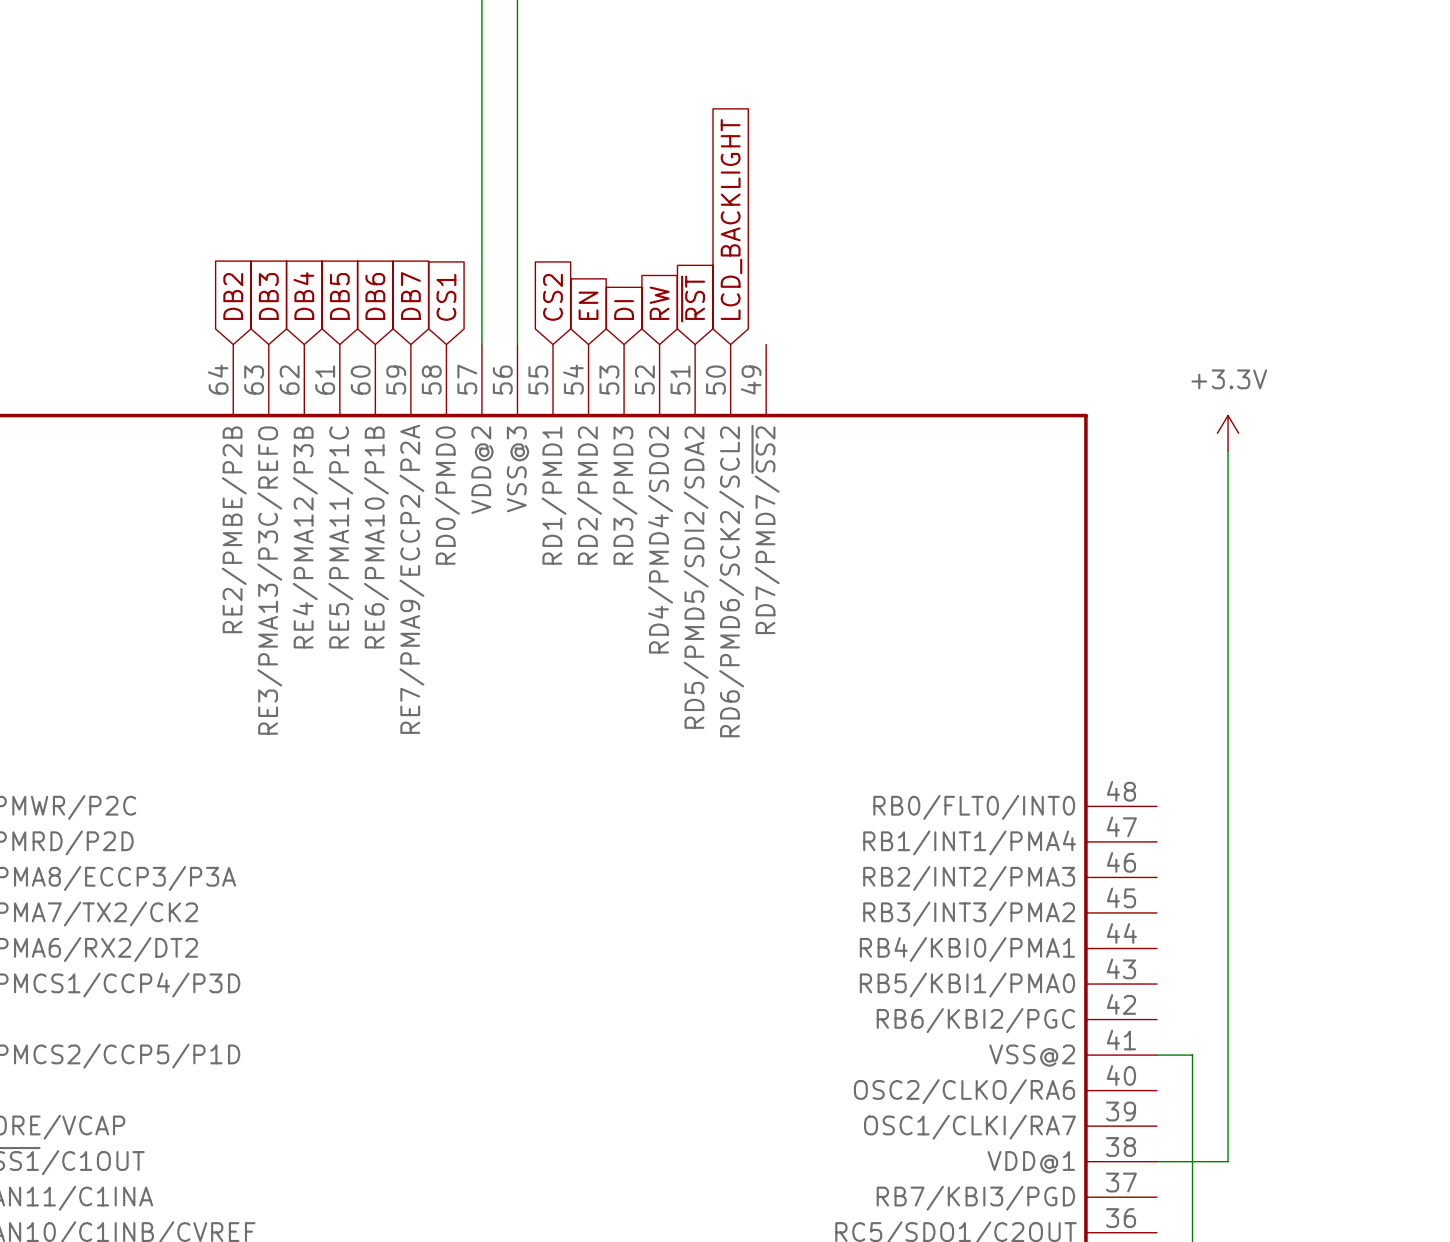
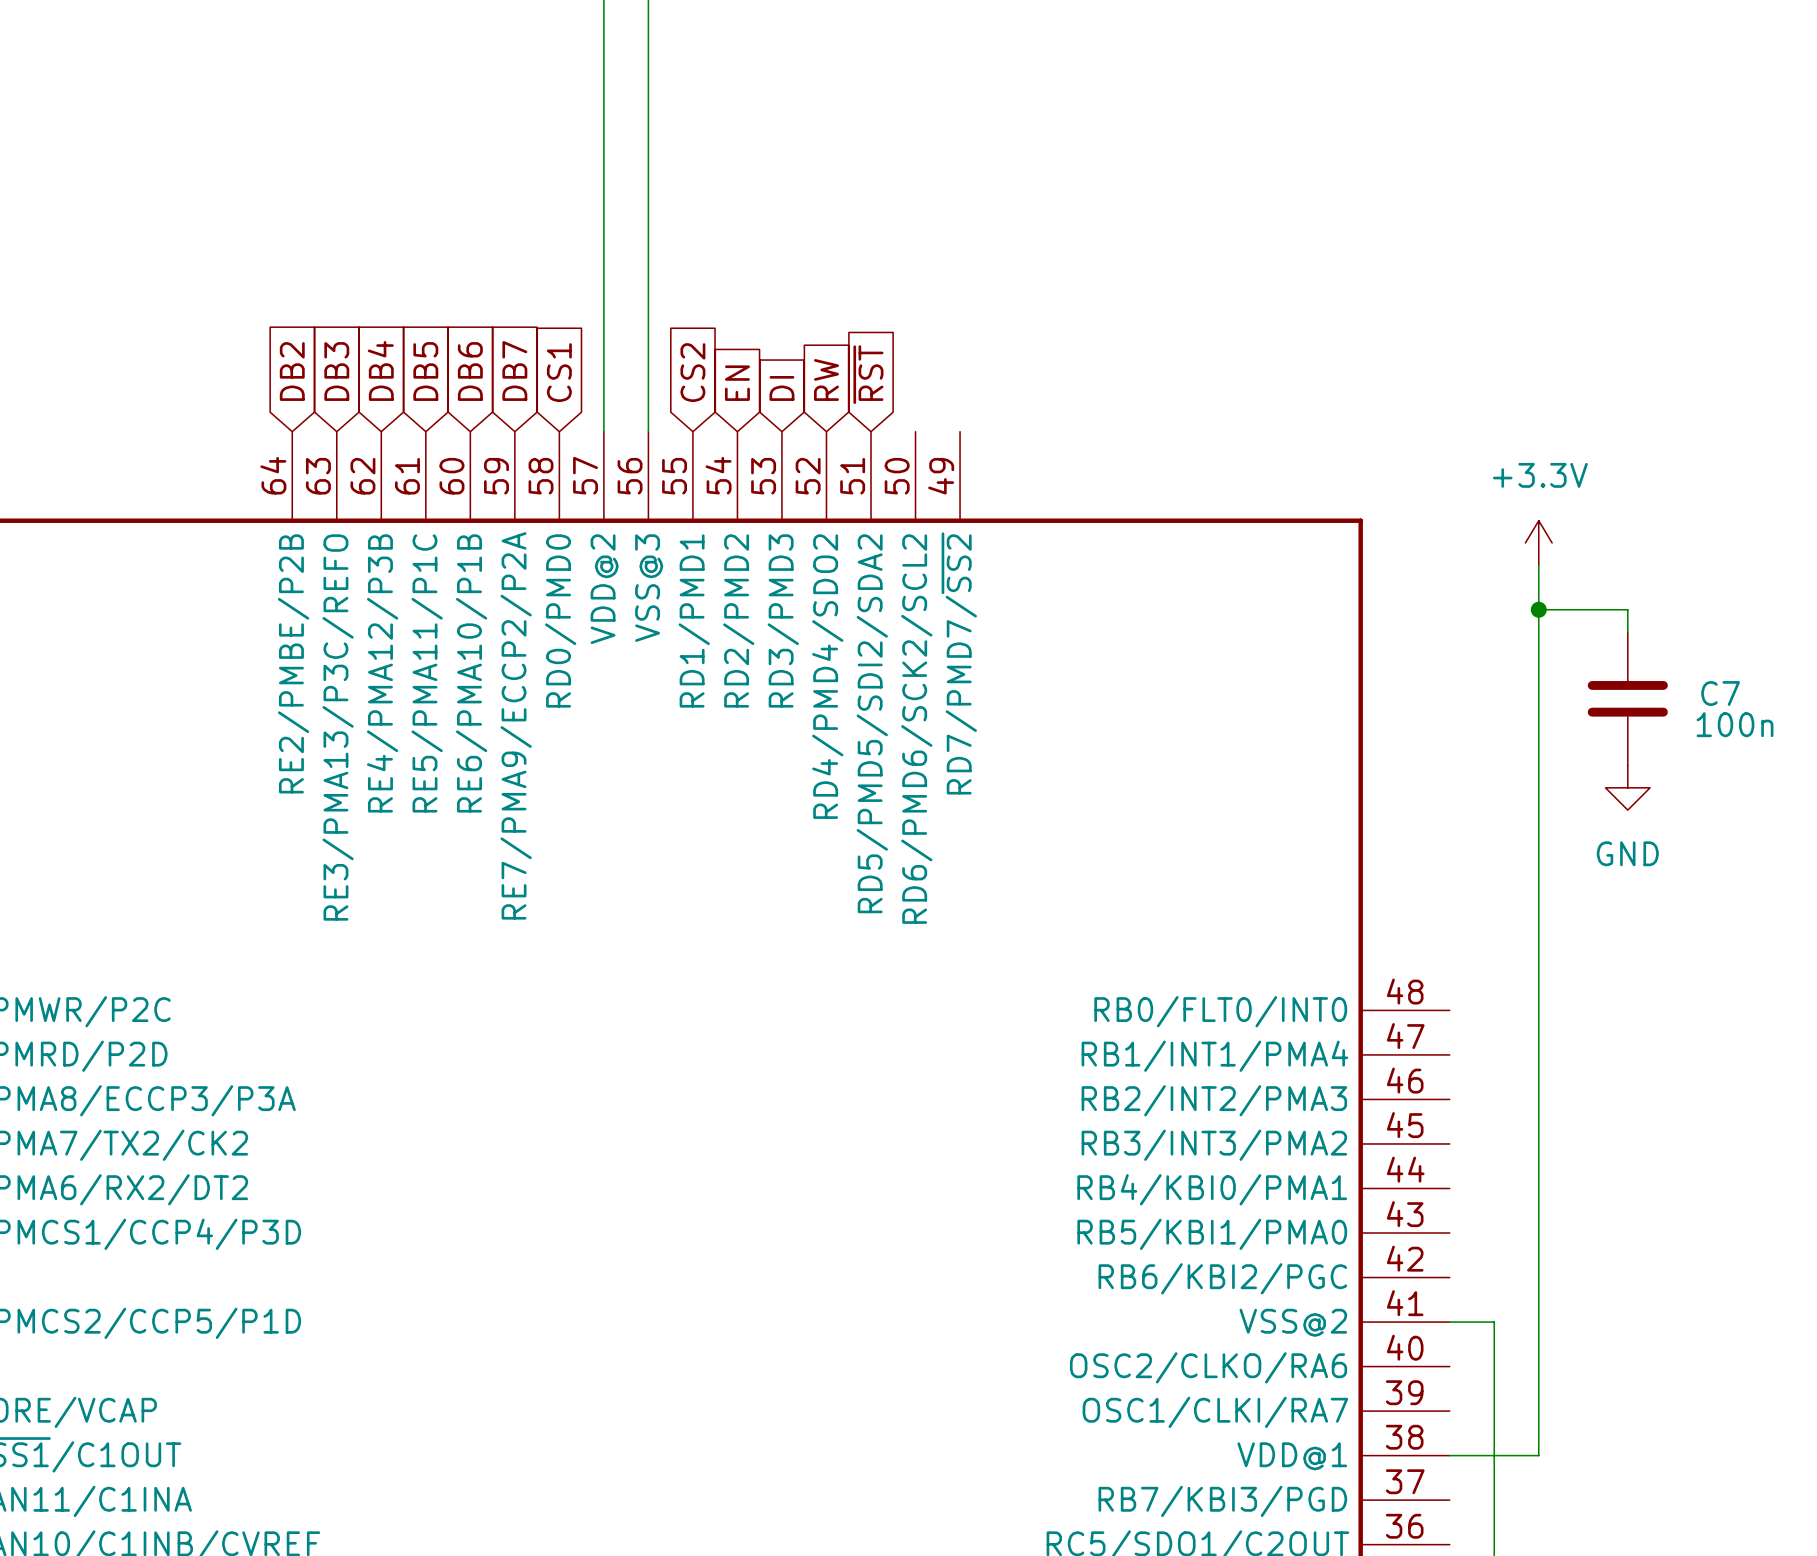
global label: LCD_BACKLIGHT (731, 219) -> none
wire: none -> (1538, 609) (1627, 609) (1627, 632)
junction: none -> (1538, 609)
C7: none -> 100n (1627, 698)
power symbol: none -> GND (1627, 787)

